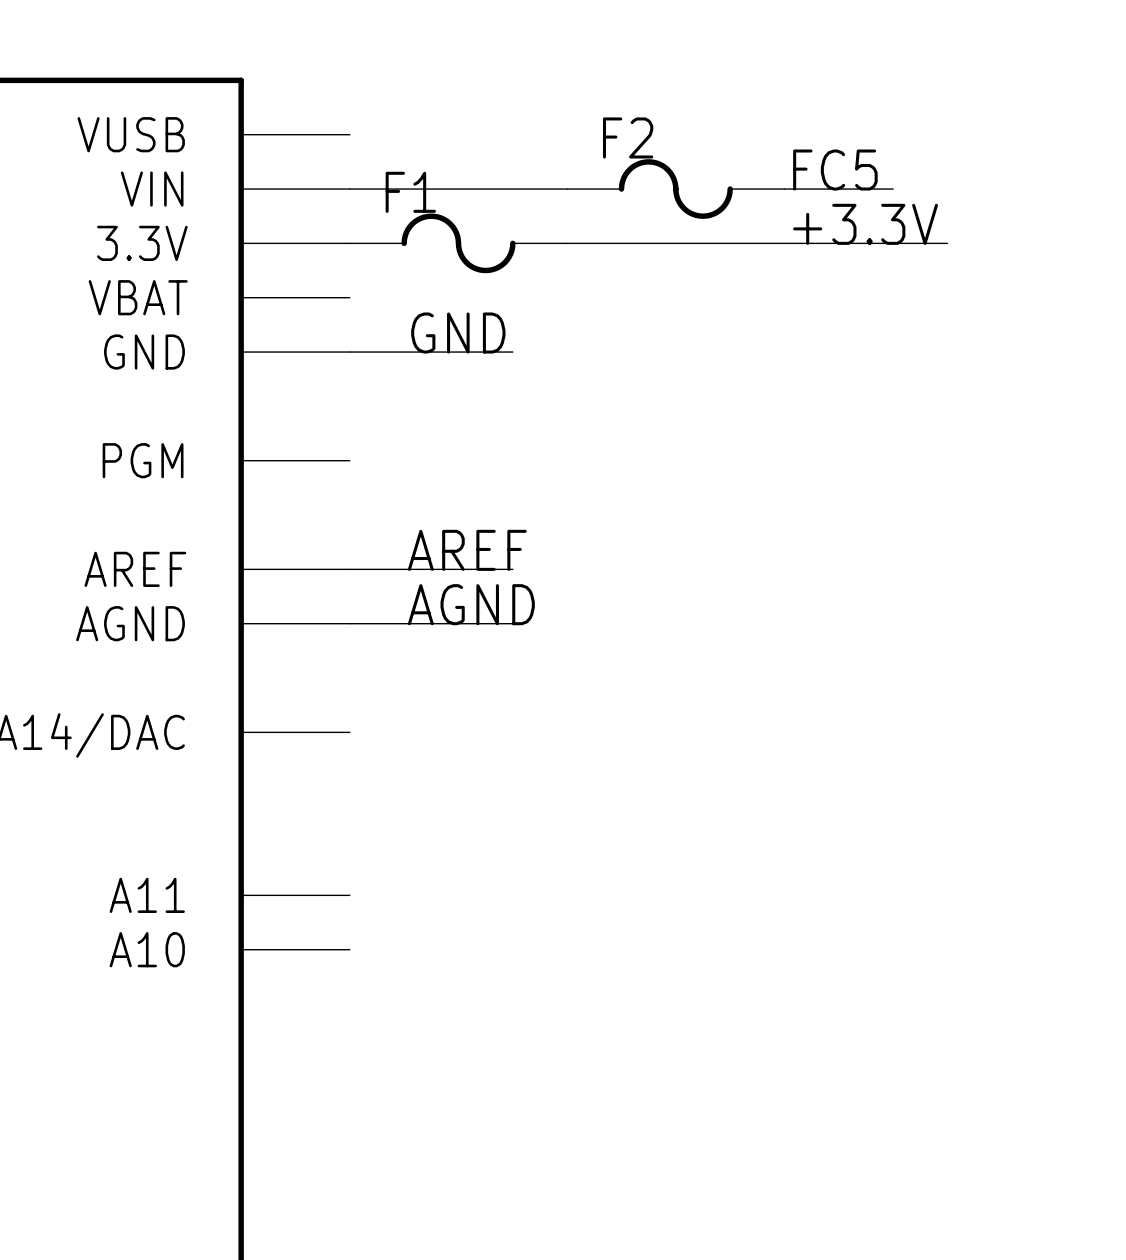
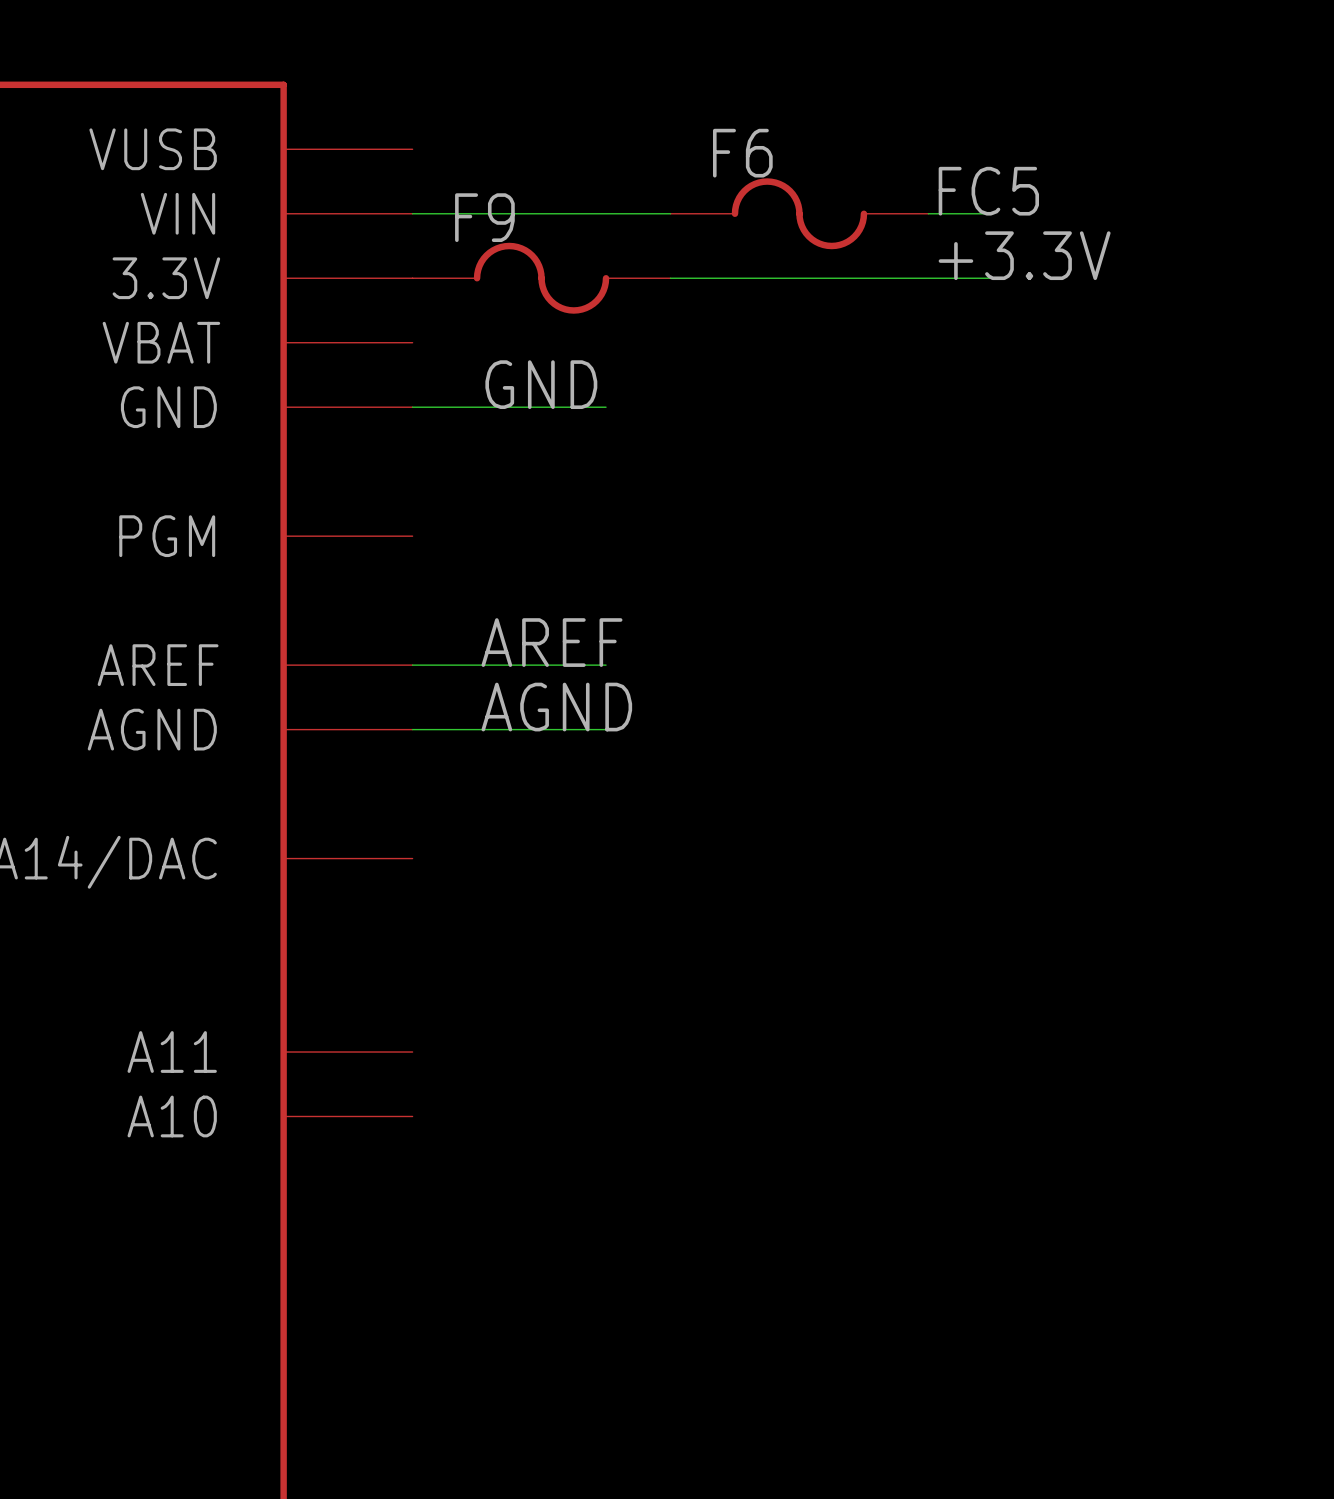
F2 name: F2 (628, 137) -> F6 (742, 153)
wire: (838, 189) (893, 189) -> none
F1 name: F1 (410, 192) -> F9 (484, 217)
wire: (838, 243) (947, 243) -> none

